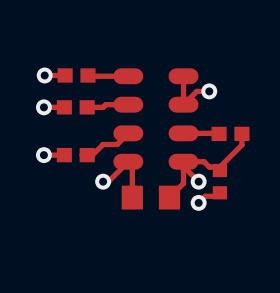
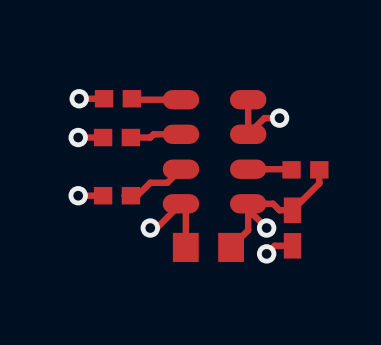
part footprint: [212, 163, 228, 200] -> [283, 197, 302, 259]

